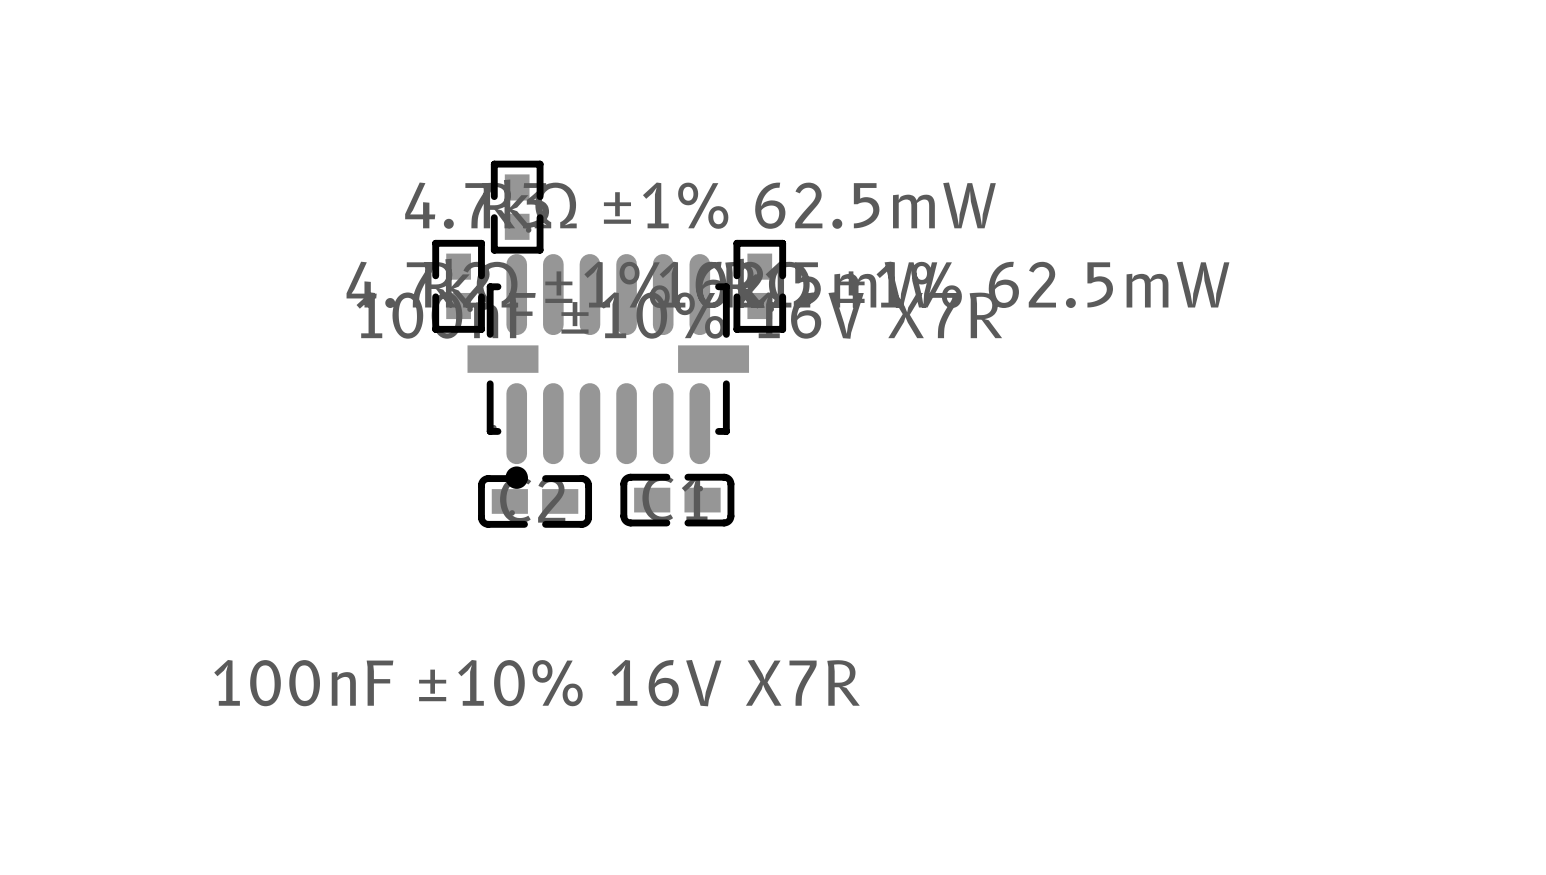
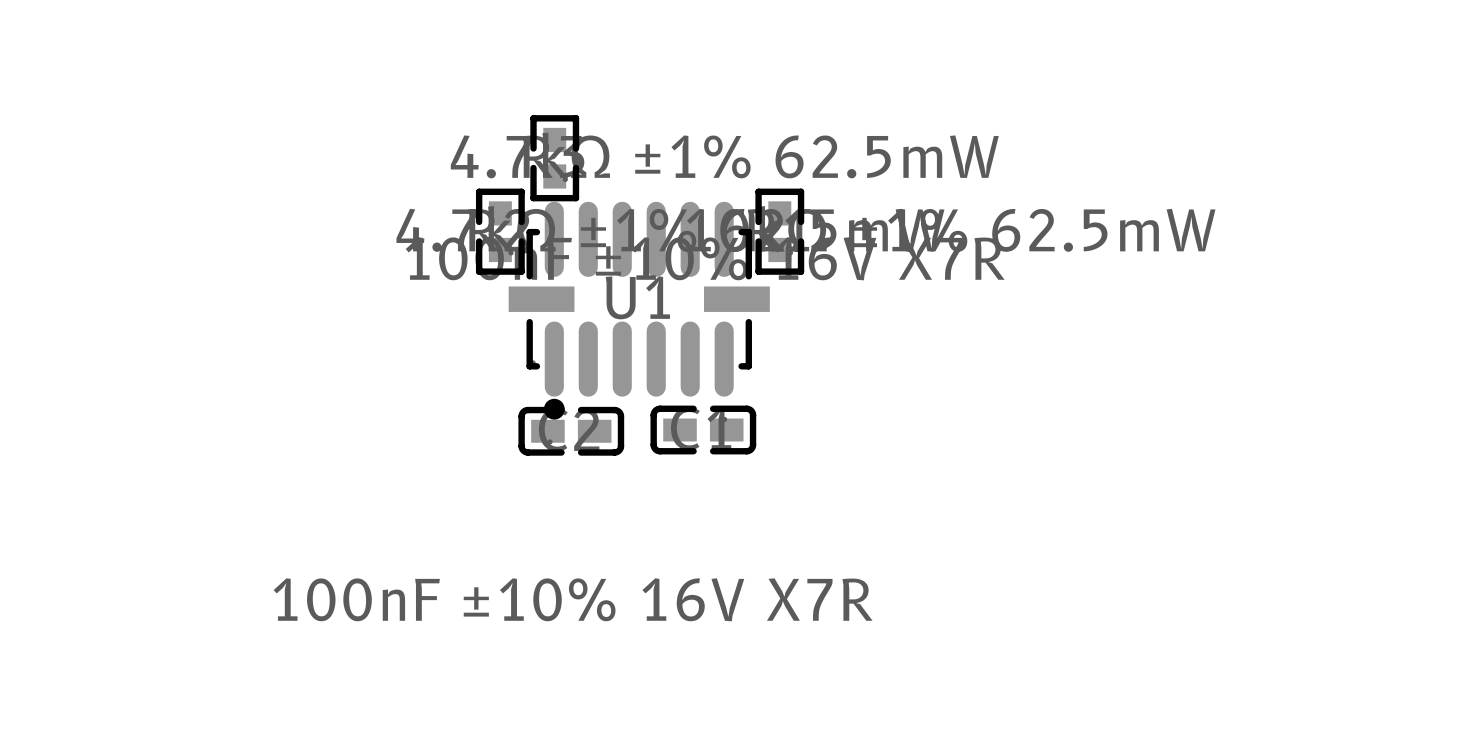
U1 name: none -> U1 (637, 297)

